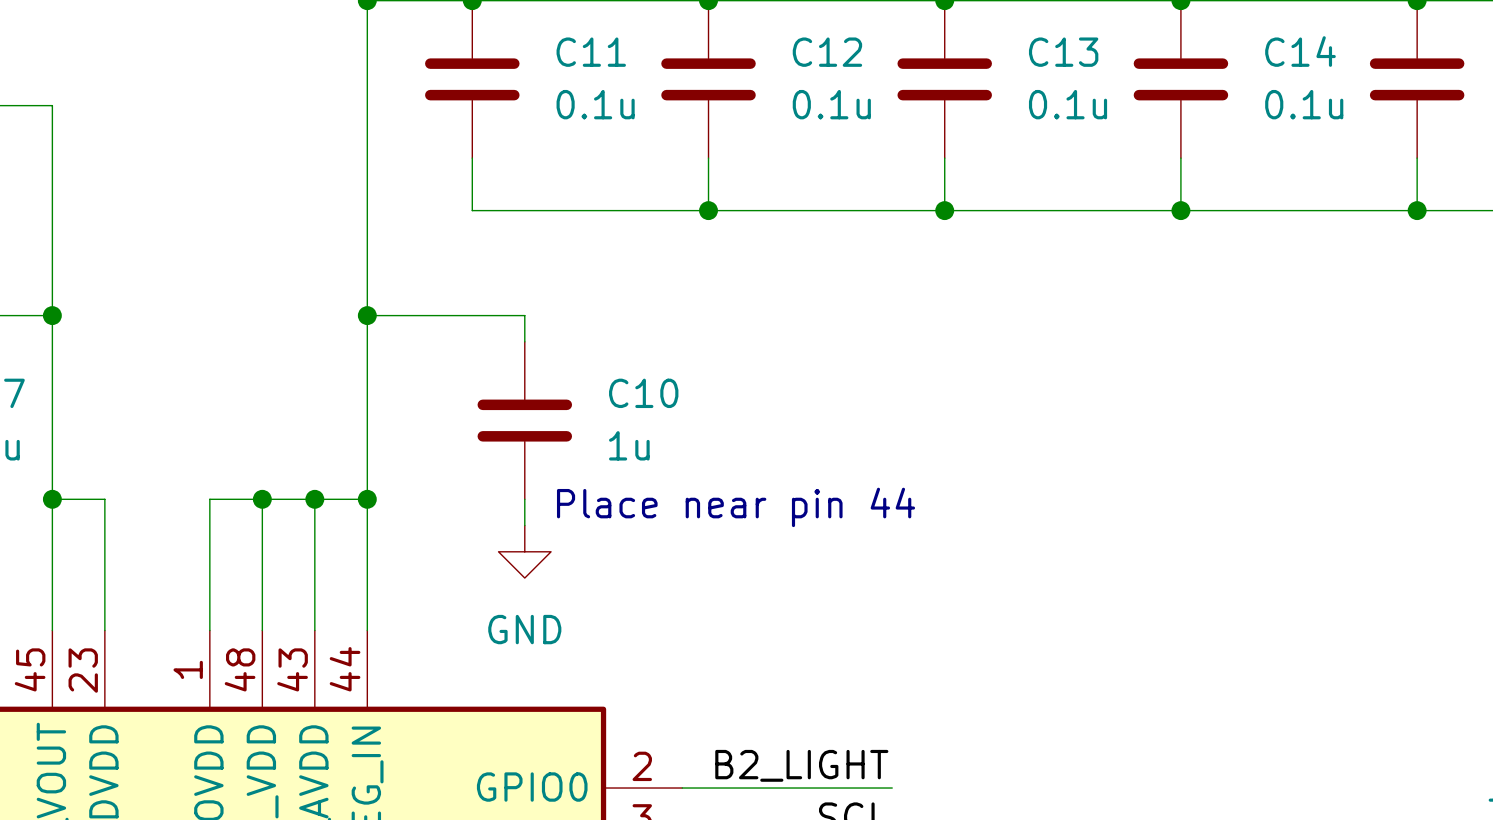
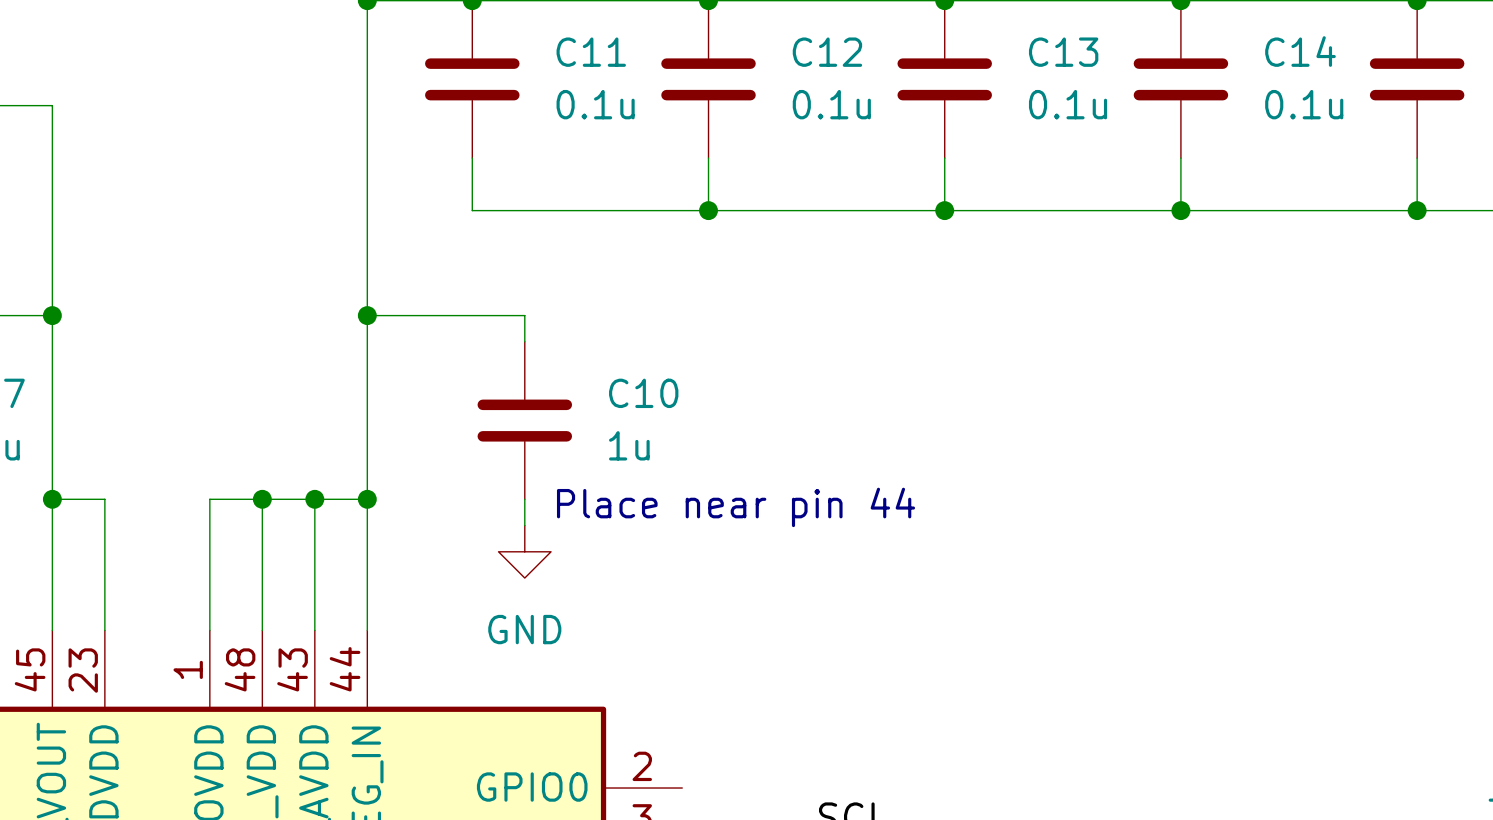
label: B2_LIGHT (801, 765) -> none
wire: (682, 788) (892, 788) -> none

